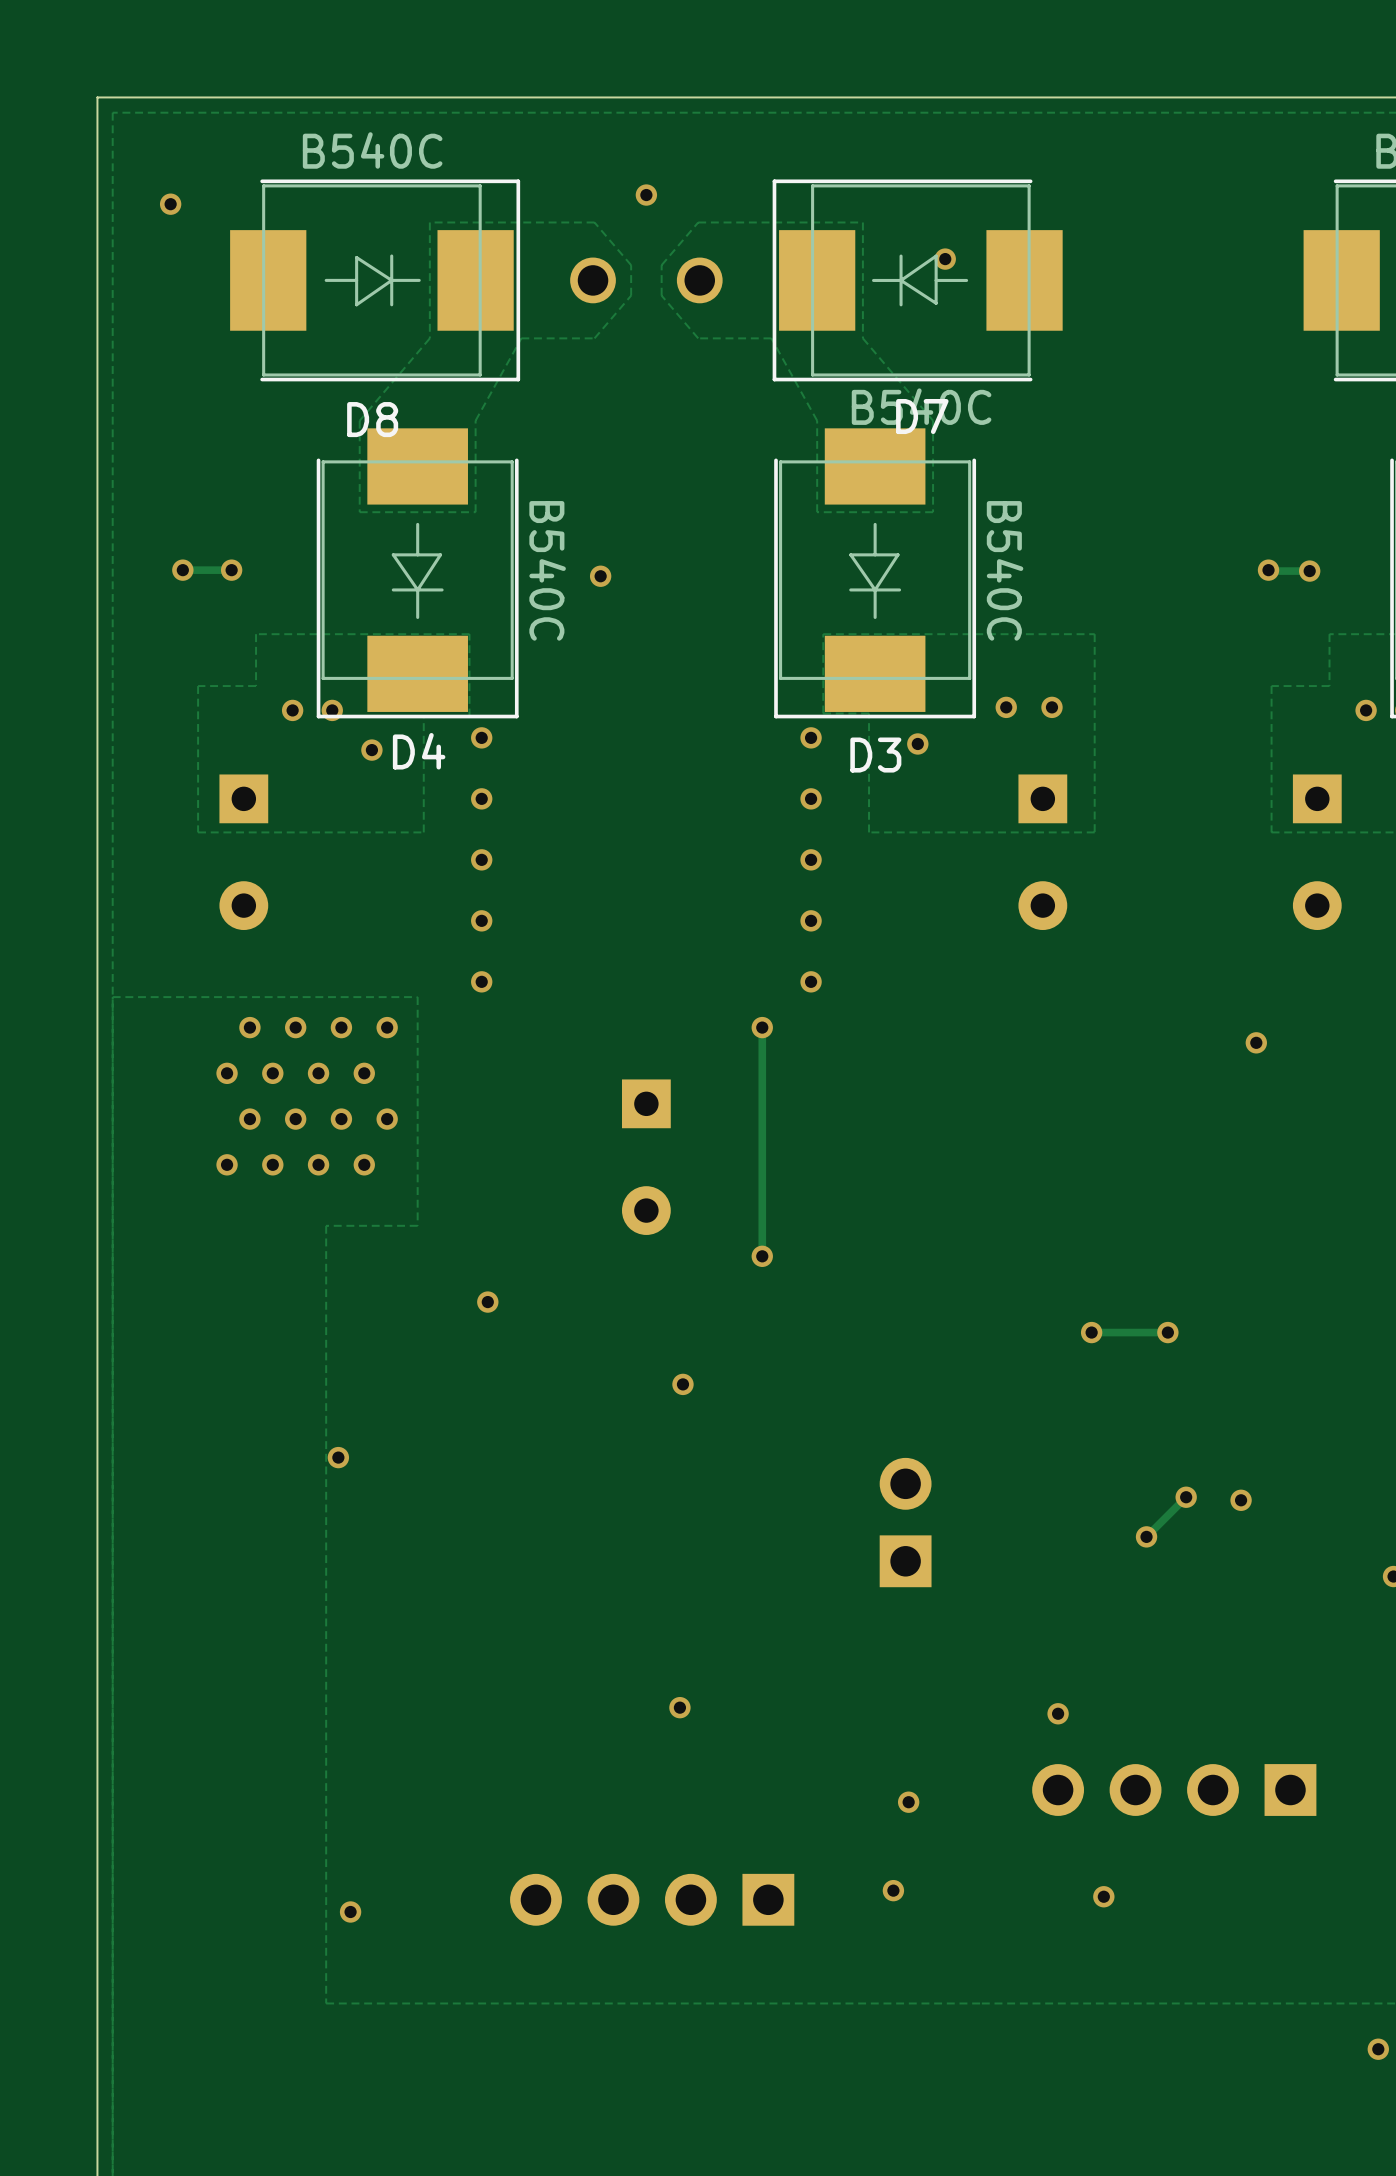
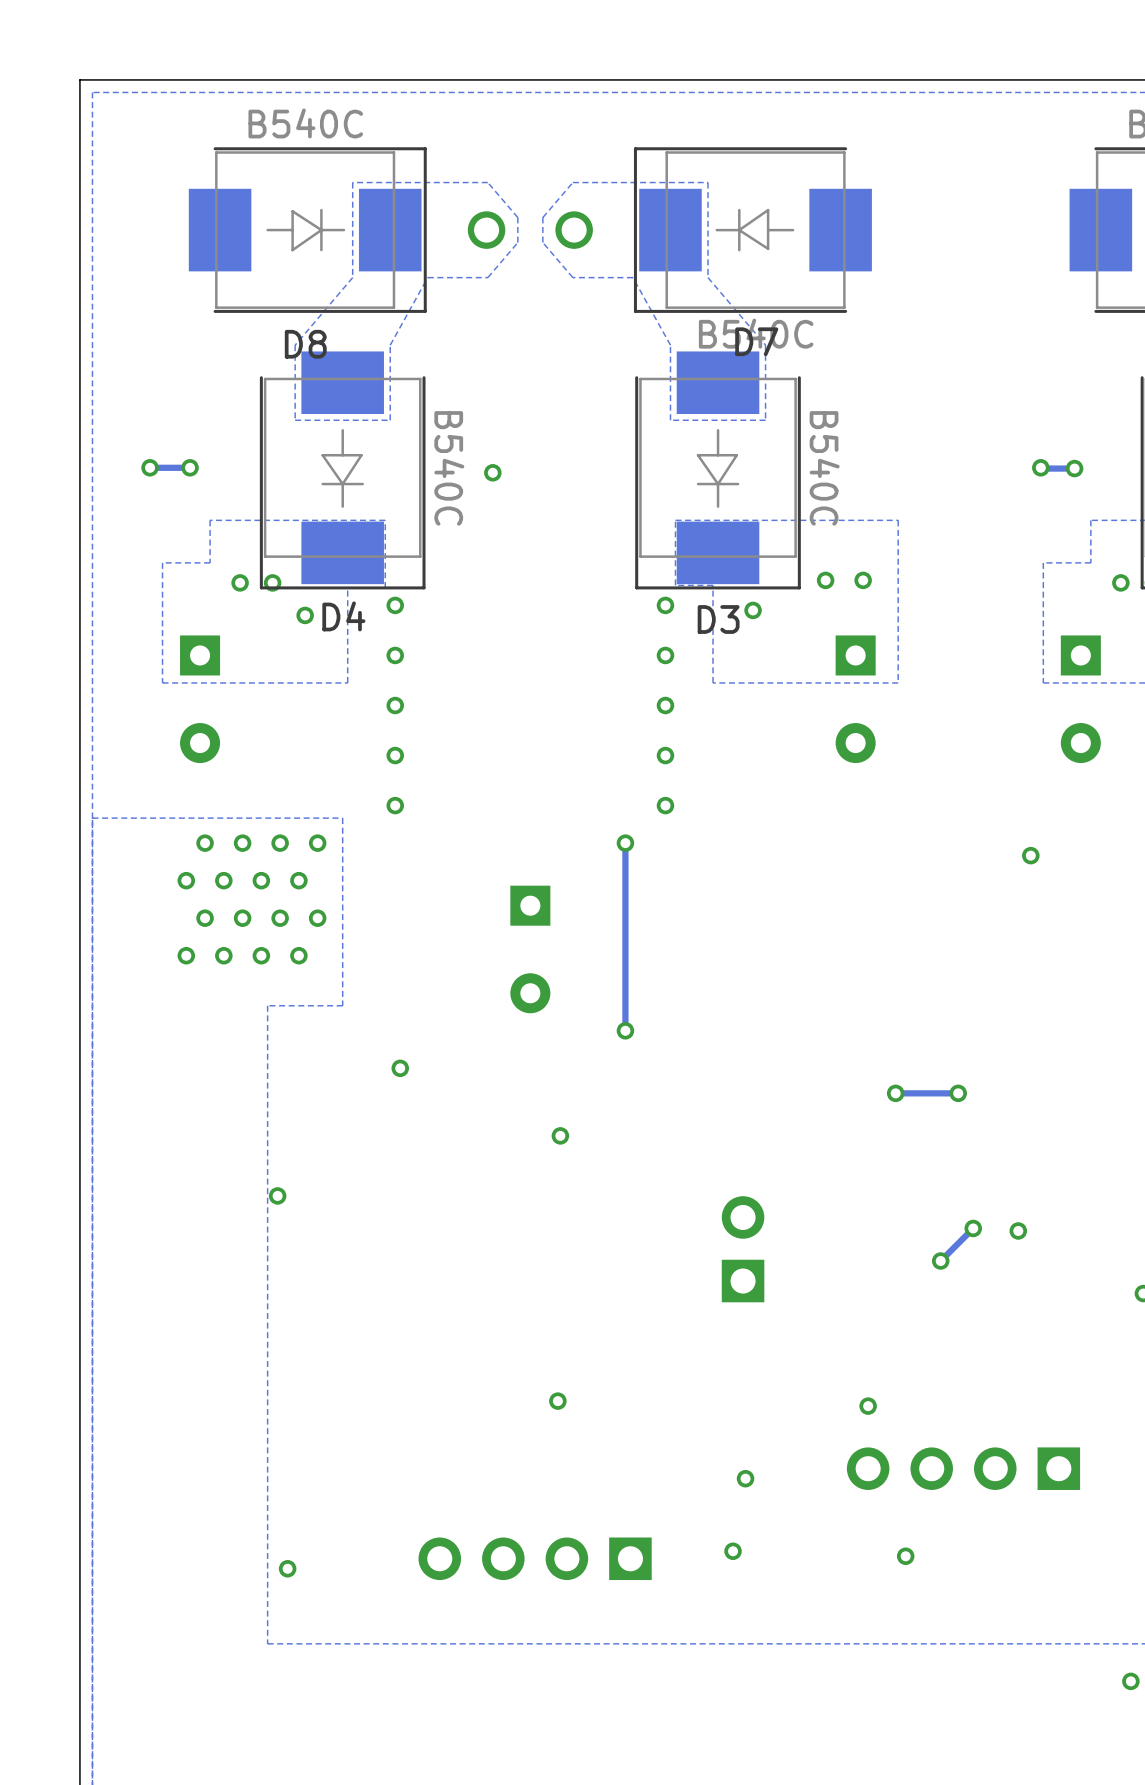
via: (646, 195) -> none
via: (170, 204) -> none
via: (945, 259) -> none

